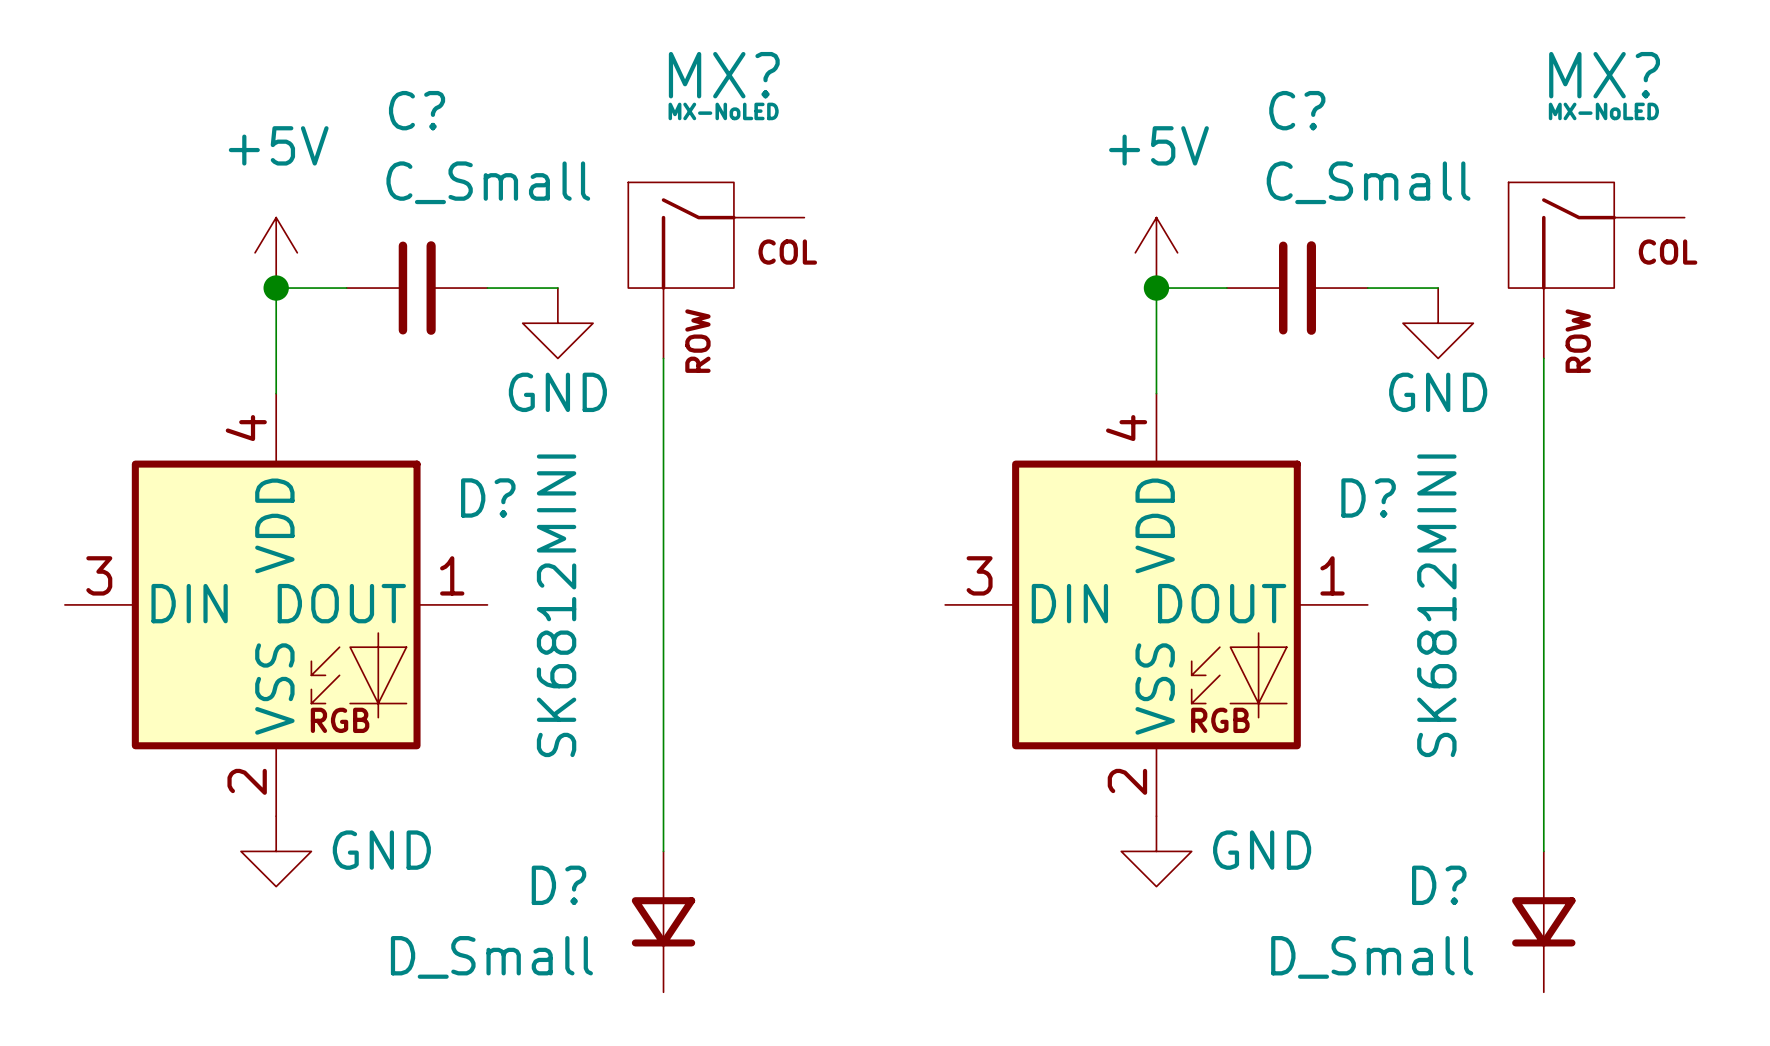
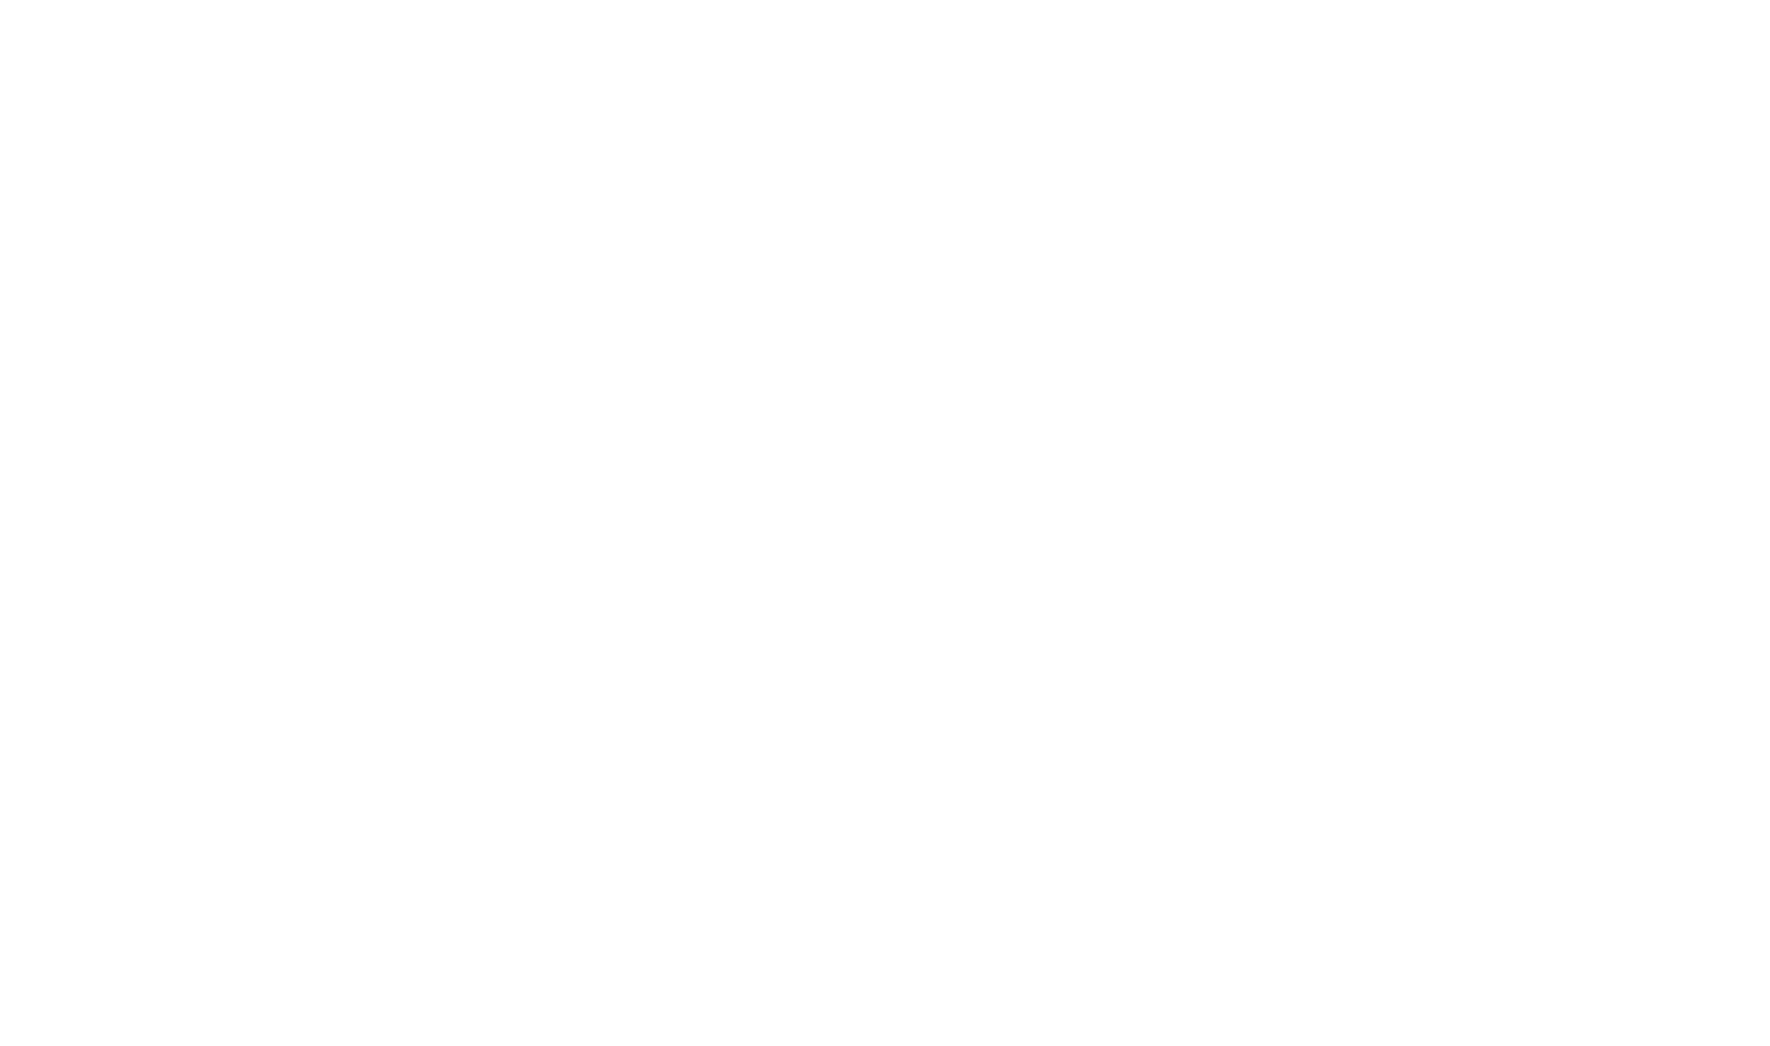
power symbol: +5V (276, 252) -> none
power symbol: +5V (1156, 252) -> none
MX?: MX-NoLED (716, 270) -> none
MX?: MX-NoLED (1596, 270) -> none
junction: (276, 288) -> none
wire: (346, 288) (276, 288) (276, 393) -> none
C?: C_Small (417, 288) -> none
wire: (487, 288) (557, 288) -> none
junction: (1156, 288) -> none
wire: (1226, 288) (1156, 288) (1156, 393) -> none
C?: C_Small (1297, 288) -> none
wire: (1367, 288) (1438, 288) -> none
power symbol: GND (557, 323) -> none
power symbol: GND (1438, 323) -> none
wire: (663, 358) (663, 851) -> none
wire: (1543, 358) (1543, 851) -> none
D?: SK6812MINI (276, 604) -> none
D?: SK6812MINI (1156, 604) -> none
power symbol: GND (276, 851) -> none
power symbol: GND (1156, 851) -> none
D?: D_Small (663, 921) -> none
D?: D_Small (1543, 921) -> none

